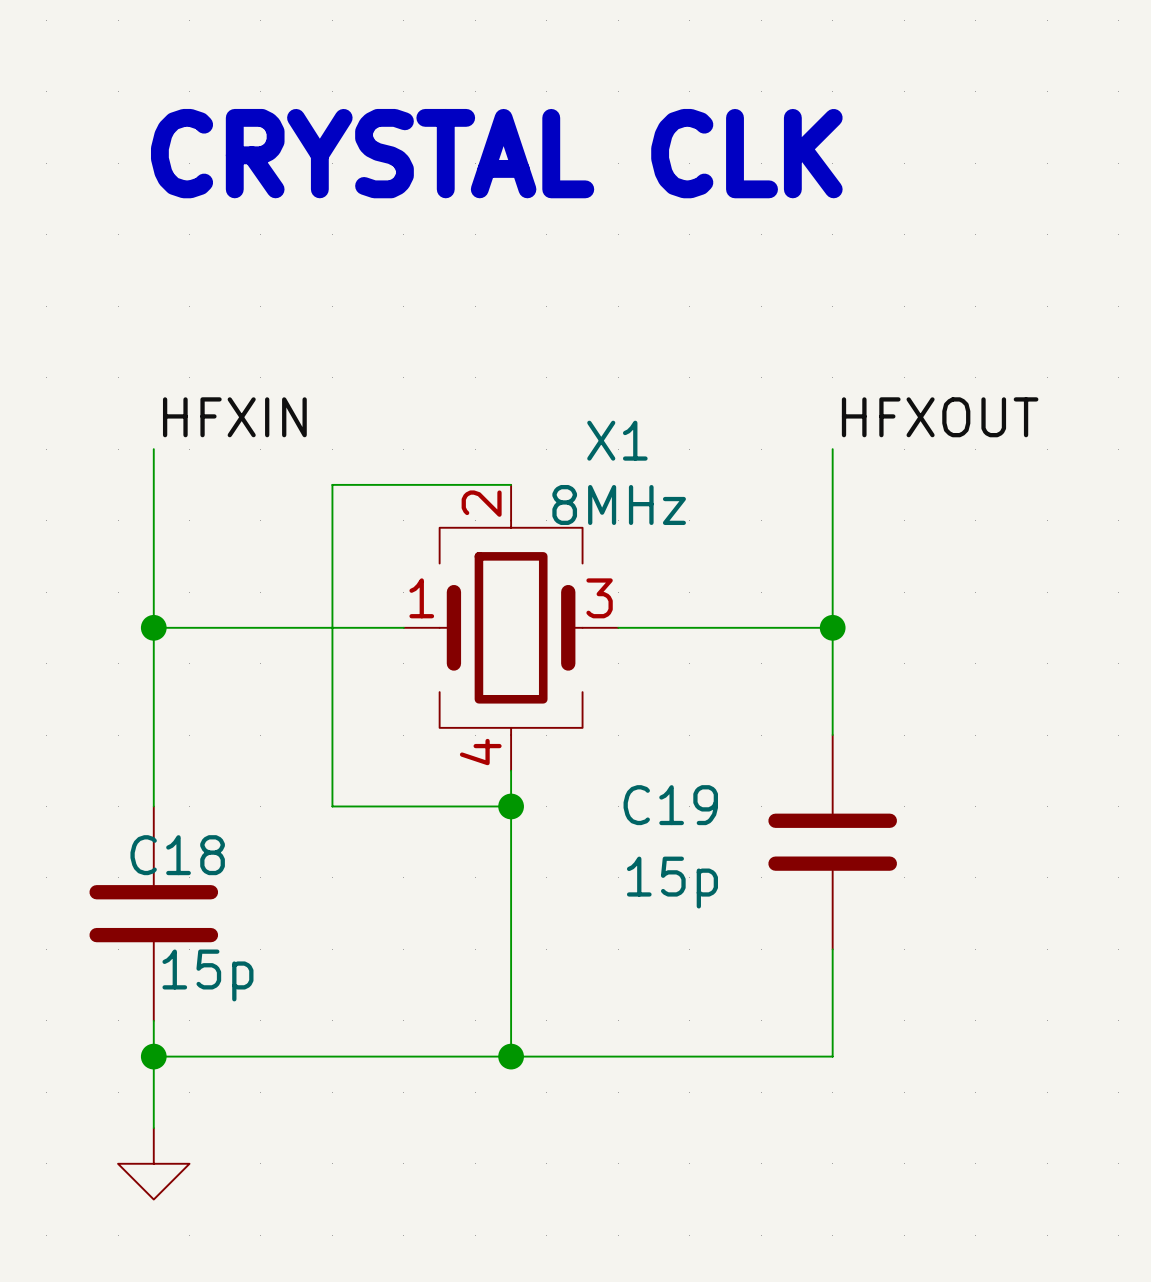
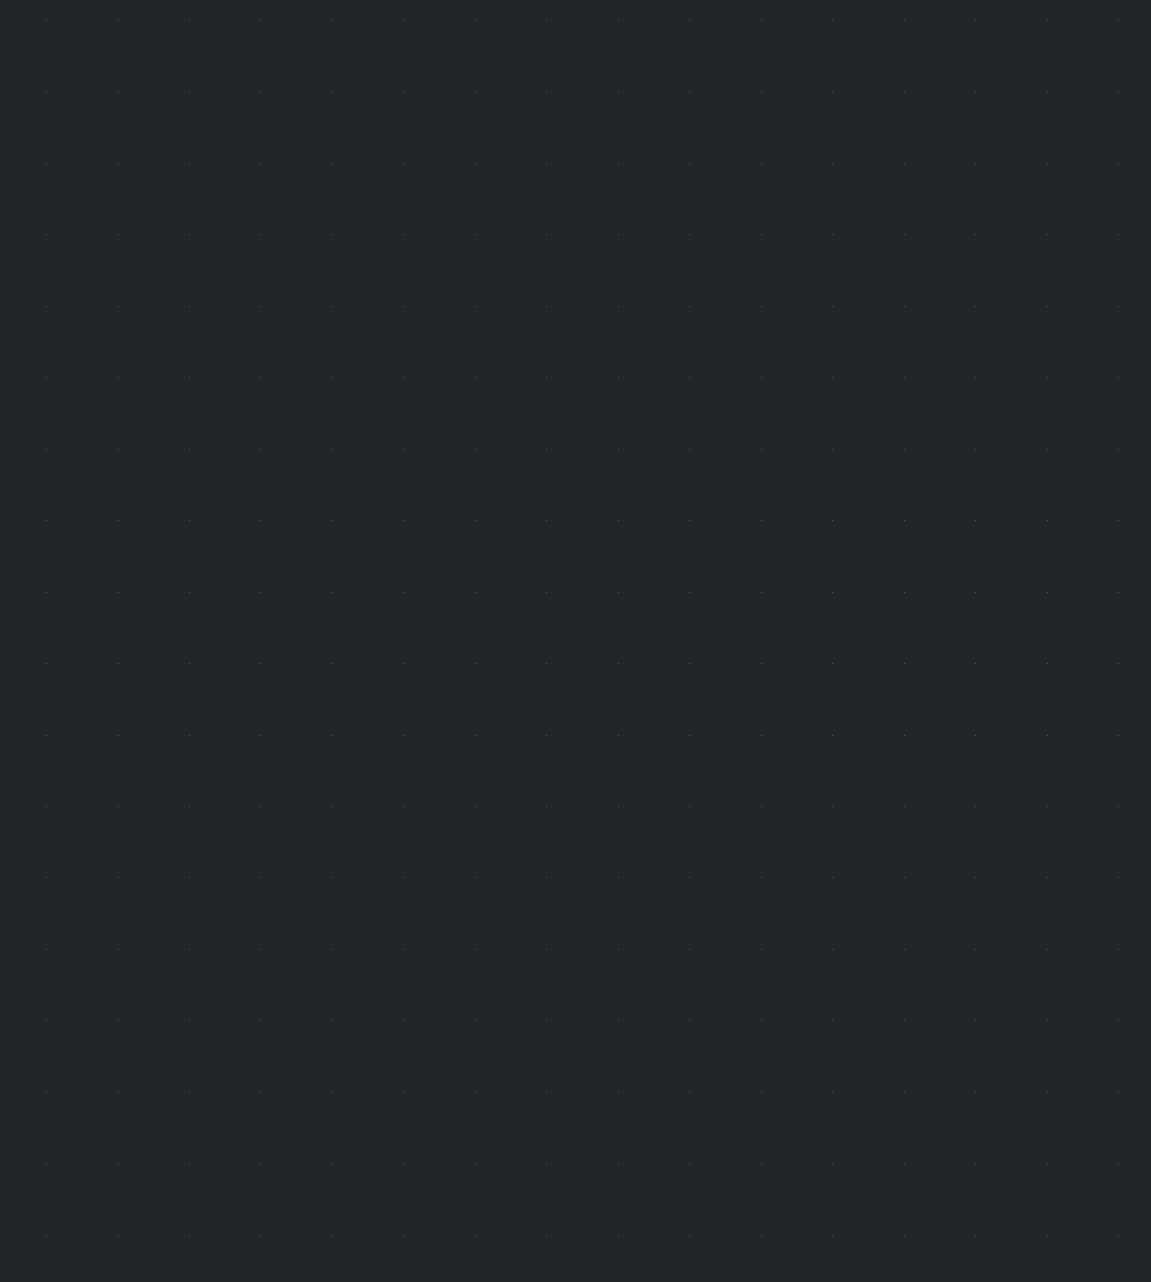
text: CRYSTAL CLK (496, 153) -> none
label: HFXIN (234, 417) -> none
label: HFXOUT (940, 417) -> none
wire: (153, 449) (153, 806) -> none
wire: (832, 449) (832, 735) -> none
wire: (511, 484) (332, 484) (332, 806) (511, 806) -> none
wire: (153, 627) (403, 627) -> none
junction: (153, 627) -> none
X1: 8MHz (511, 627) -> none
wire: (618, 627) (832, 627) -> none
junction: (832, 627) -> none
wire: (511, 770) (511, 1056) -> none
junction: (511, 806) -> none
C19: 15p (832, 842) -> none
C18: 15p (153, 913) -> none
wire: (832, 949) (832, 1056) (153, 1056) -> none
wire: (153, 1020) (153, 1128) -> none
junction: (153, 1056) -> none
junction: (511, 1056) -> none
power symbol: (153, 1163) -> none

